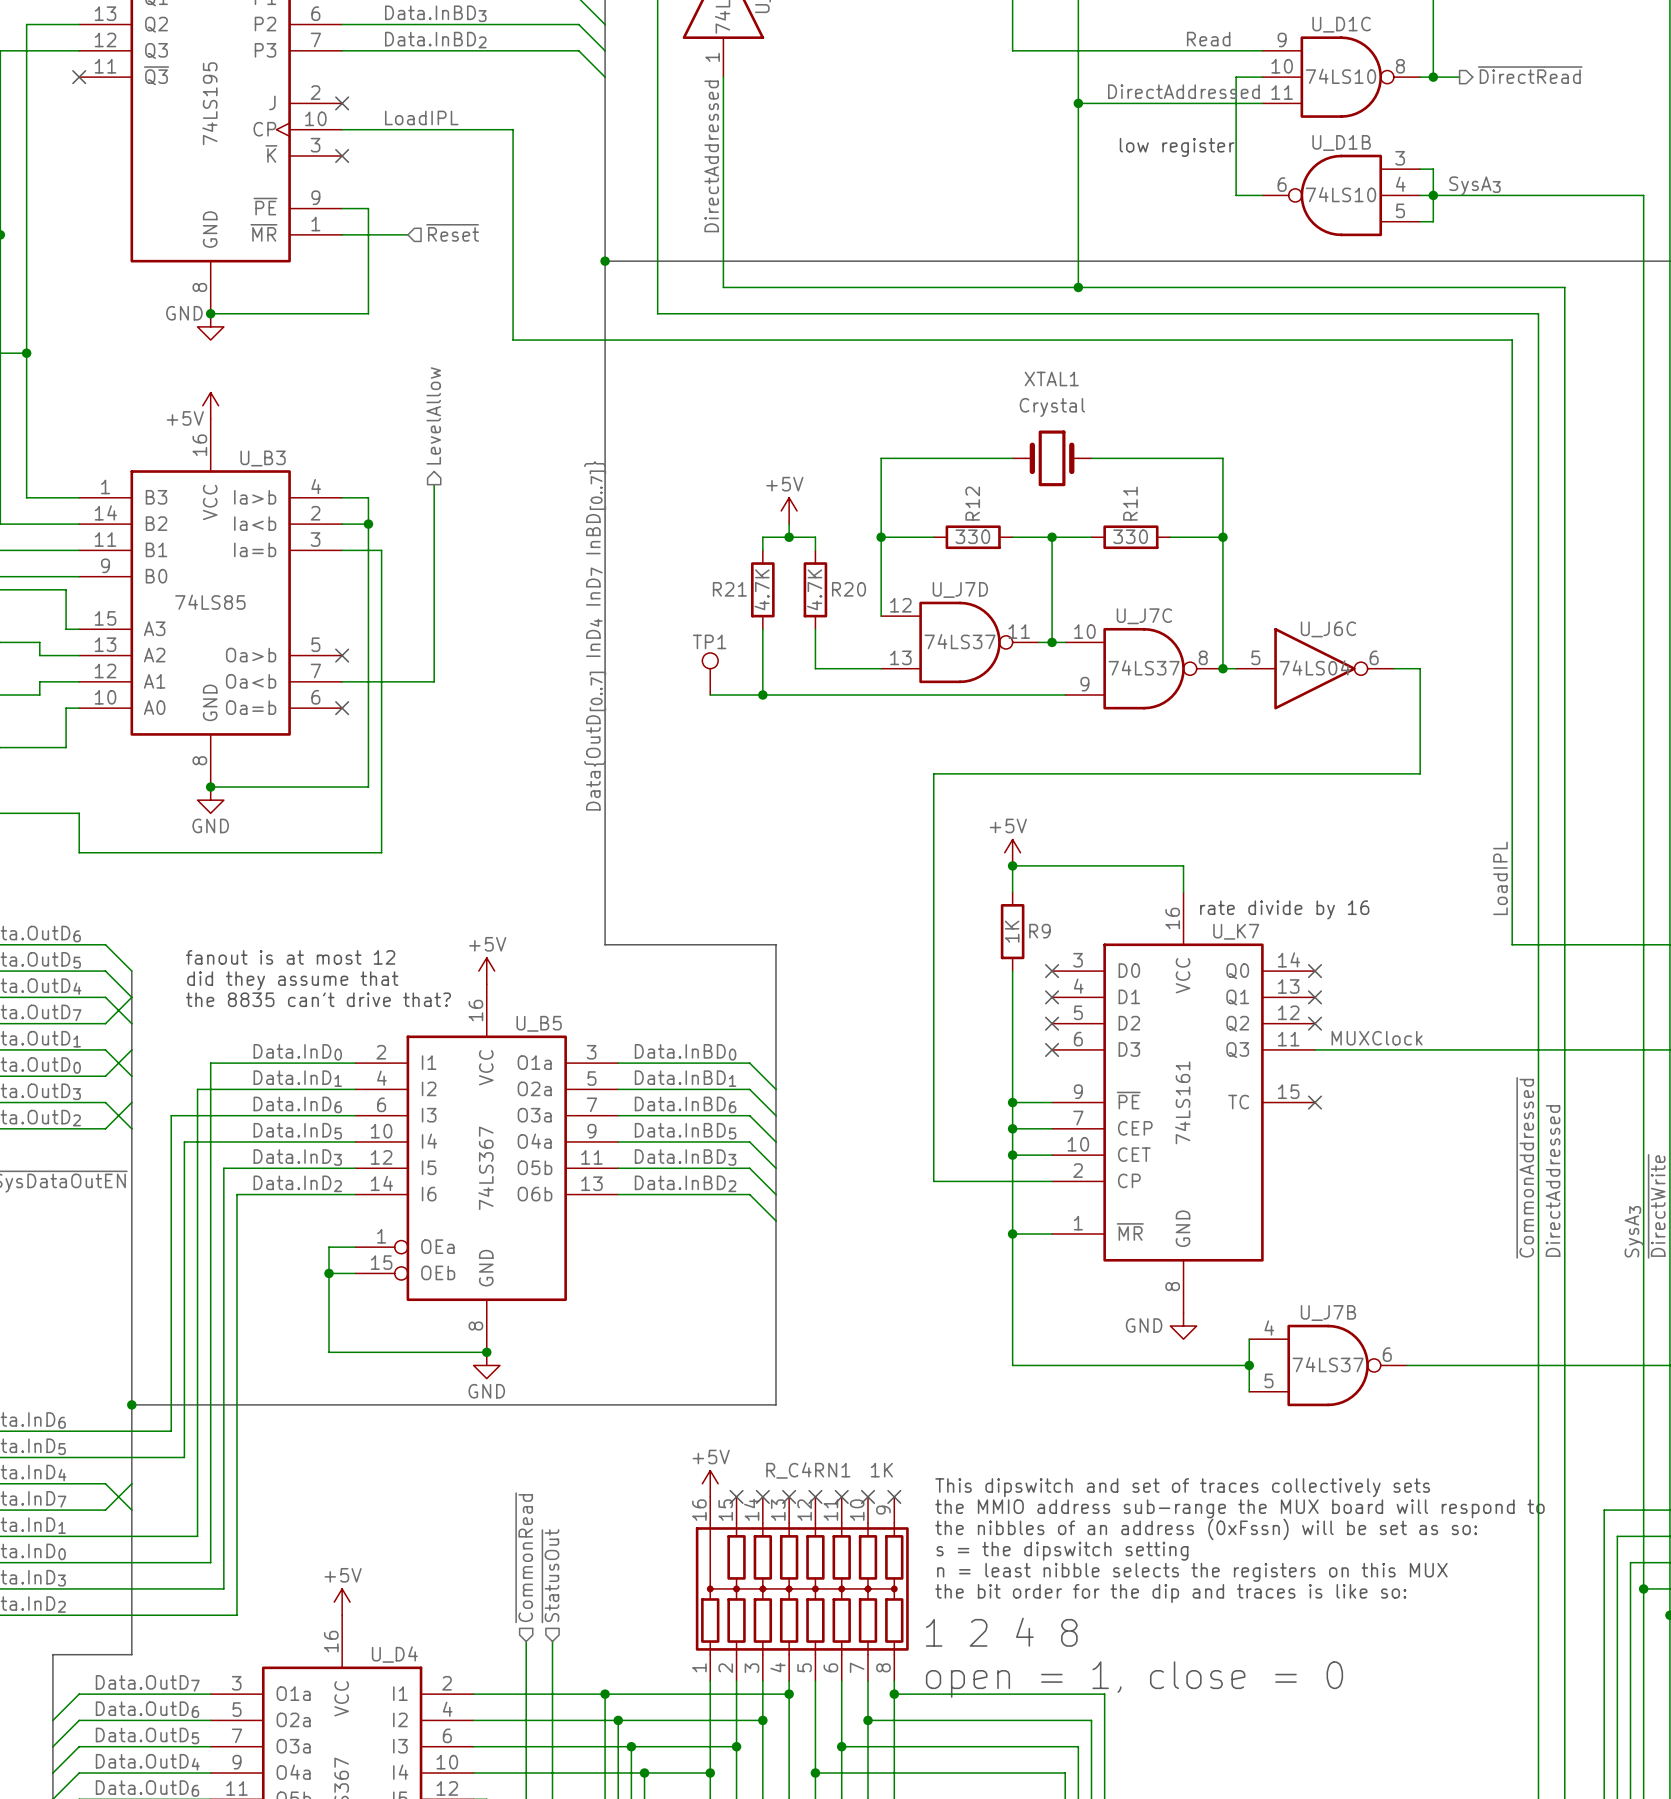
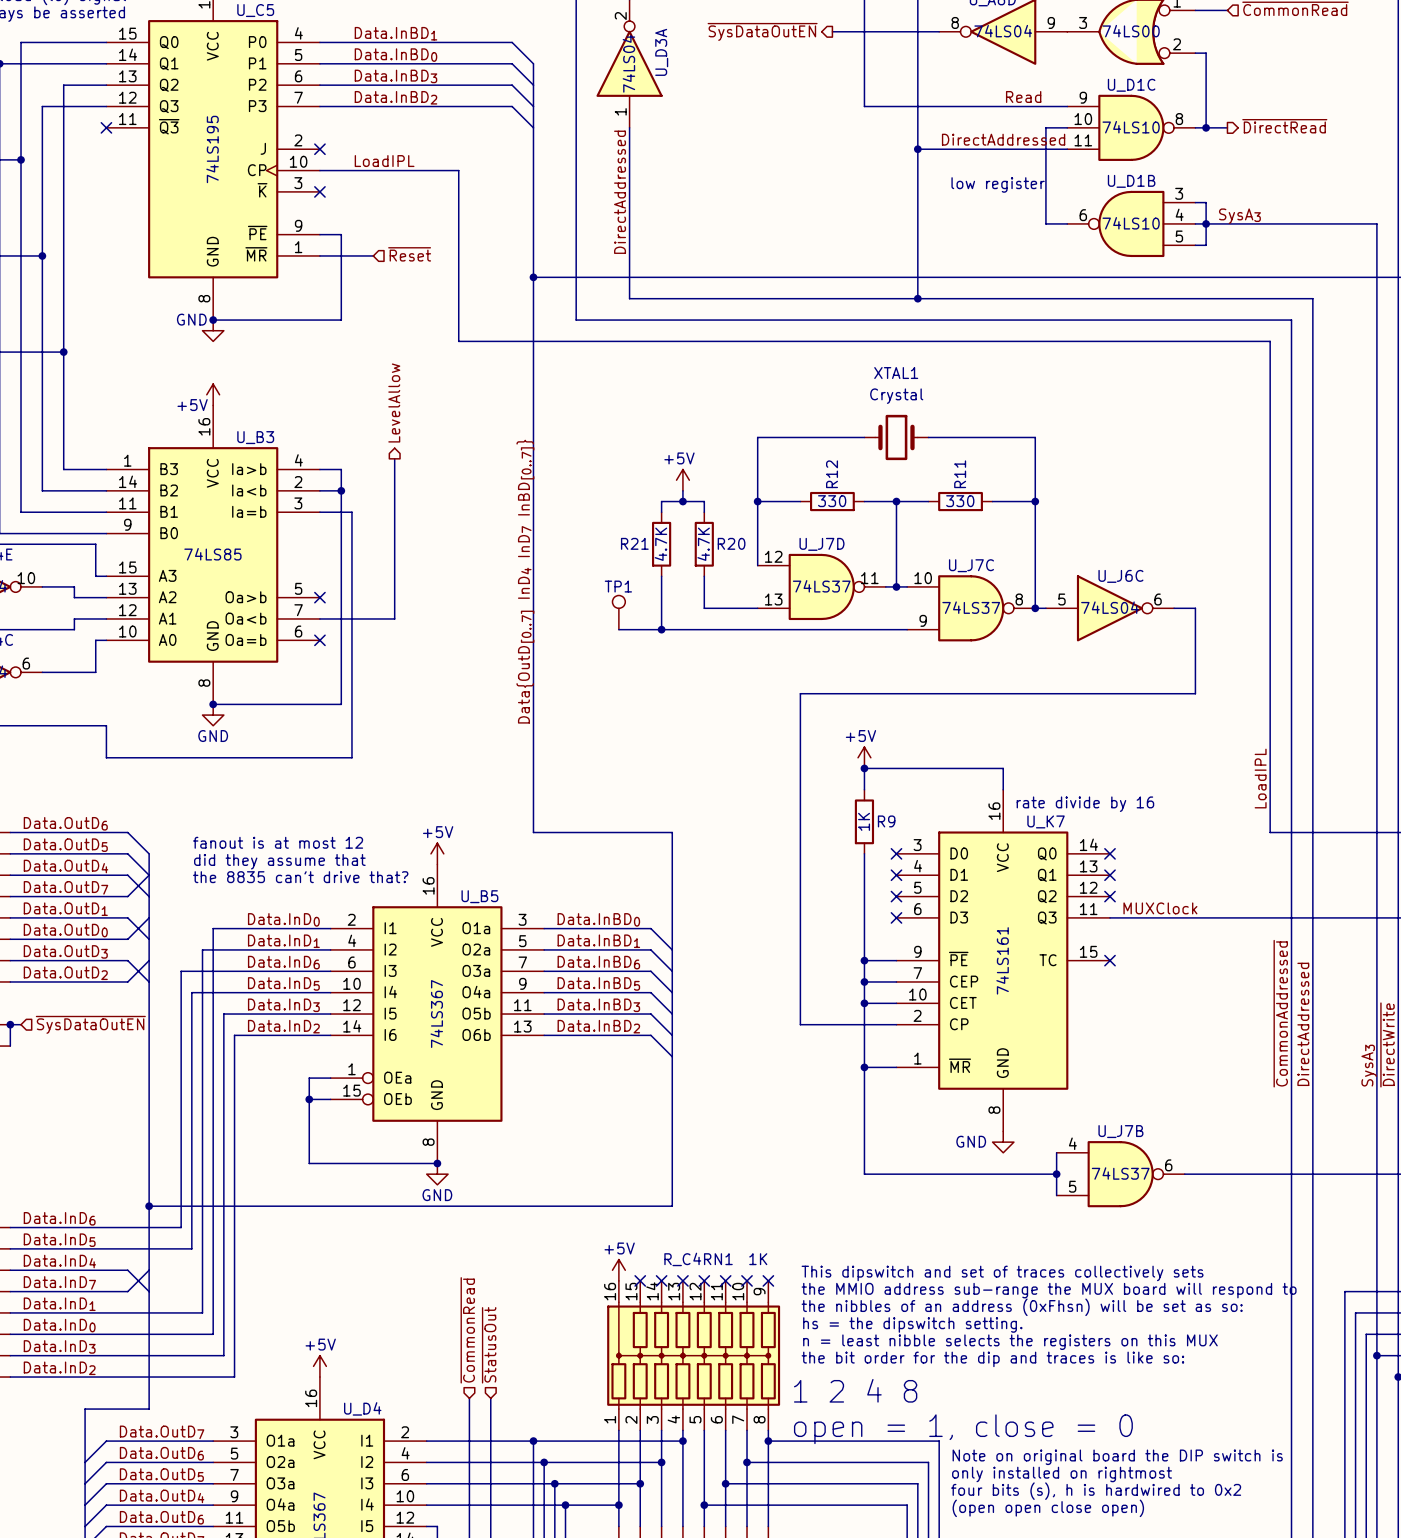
text: the nibbles of an address (0xFssn) will be set as so: (1206, 1529) -> the nibbles of an address (0xFhsn) will be set as so: (1022, 1307)
text: s = the dipswitch setting (1062, 1551) -> hs = the dipswitch setting. (912, 1324)
text: none -> Note on original board the DIP switch is (1117, 1457)
text: none -> only installed on rightmost (1062, 1474)
text: none -> four bits (s), h is hardwired to 0x2 (1096, 1491)
text: none -> (open open close open) (1048, 1508)

